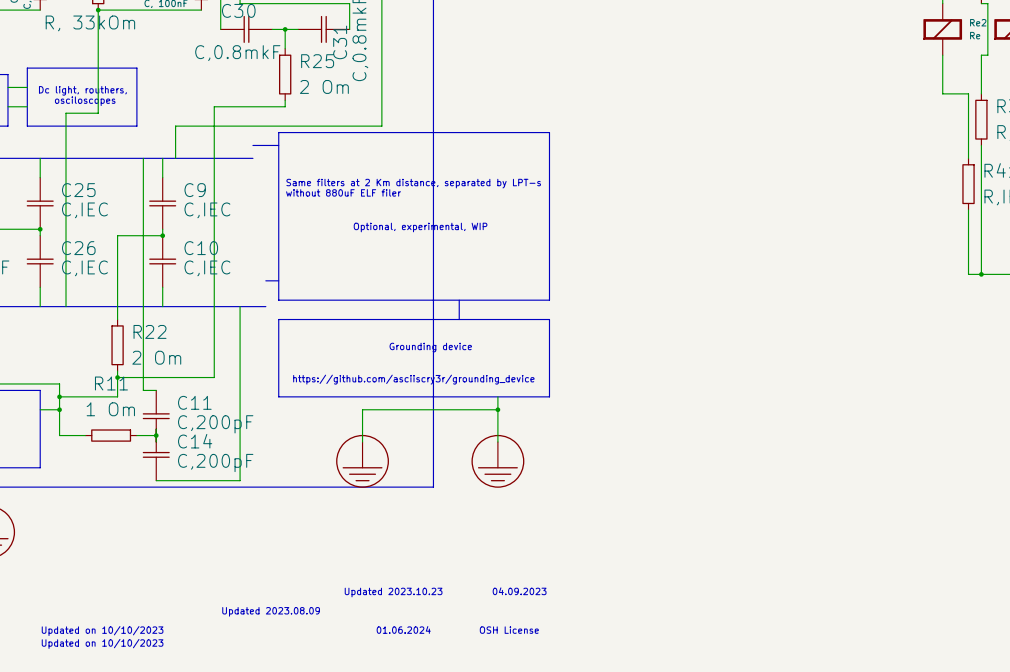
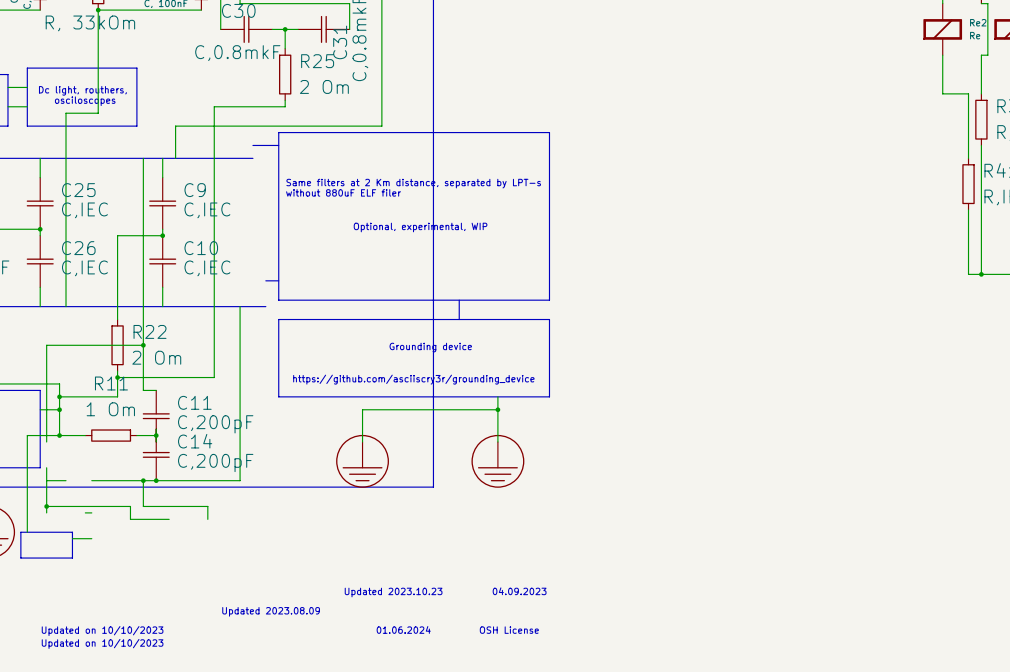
wire: none -> (143, 345) (46, 345) (46, 441)
junction: none -> (143, 345)
wire: none -> (59, 435) (27, 435) (27, 532)
junction: none -> (59, 435)
wire: none -> (46, 467) (46, 512)
wire: none -> (46, 480) (66, 480)
wire: none -> (91, 480) (156, 480)
wire: none -> (143, 480) (143, 506) (207, 506) (207, 519)
junction: none -> (143, 480)
junction: none -> (156, 480)
wire: none -> (46, 506) (130, 506) (130, 519) (169, 519)
junction: none -> (46, 506)
wire: none -> (85, 512) (91, 512)
line: none -> (20, 532) (72, 532) (72, 558) (20, 558) (20, 532)
wire: none -> (72, 538) (91, 538)

